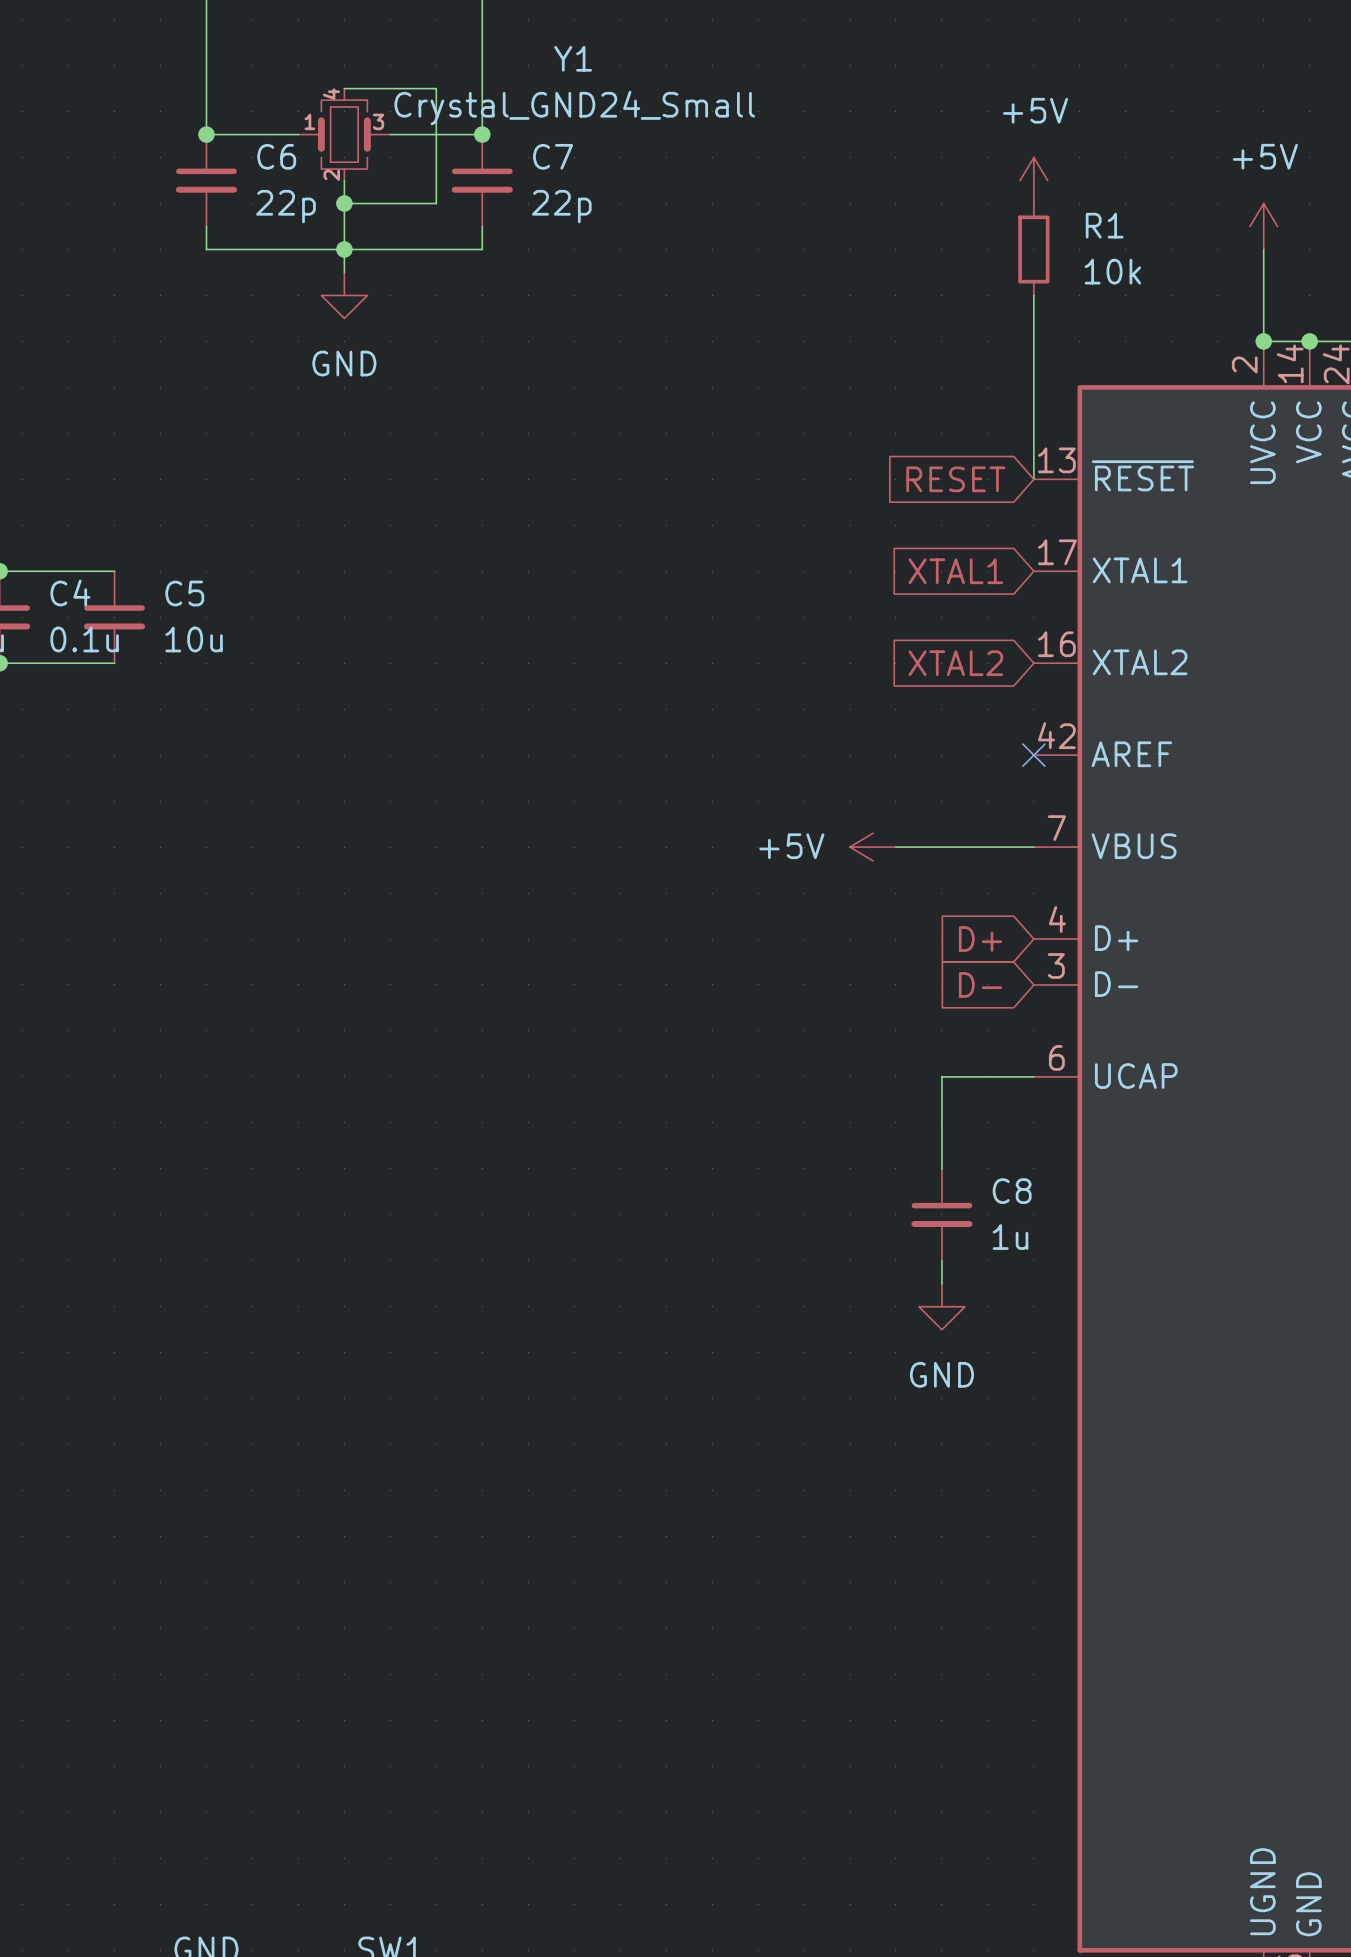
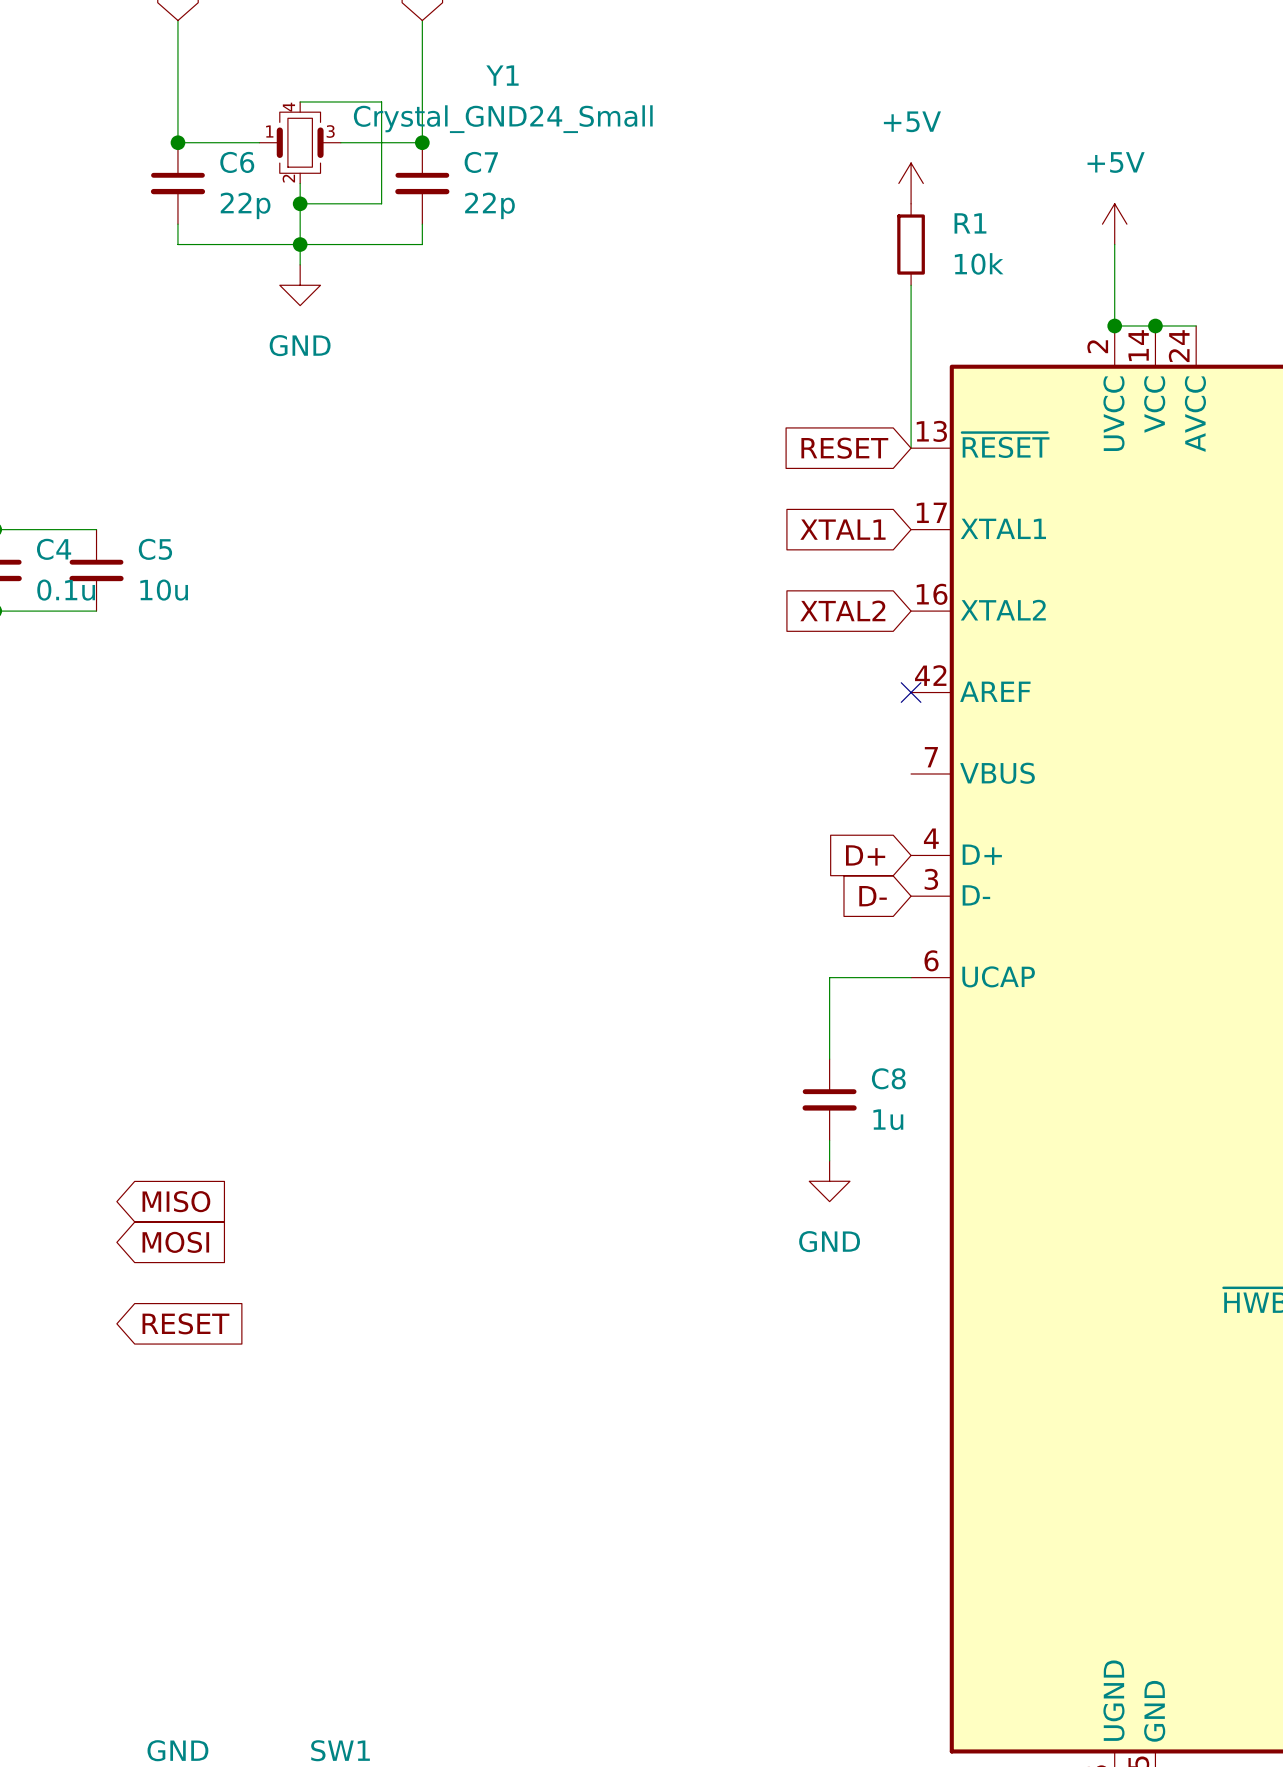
power symbol: +5V (873, 847) -> none
wire: (895, 847) (1033, 847) -> none
global label: none -> MISO (176, 1201)
global label: none -> MOSI (175, 1242)
global label: none -> RESET (185, 1323)

